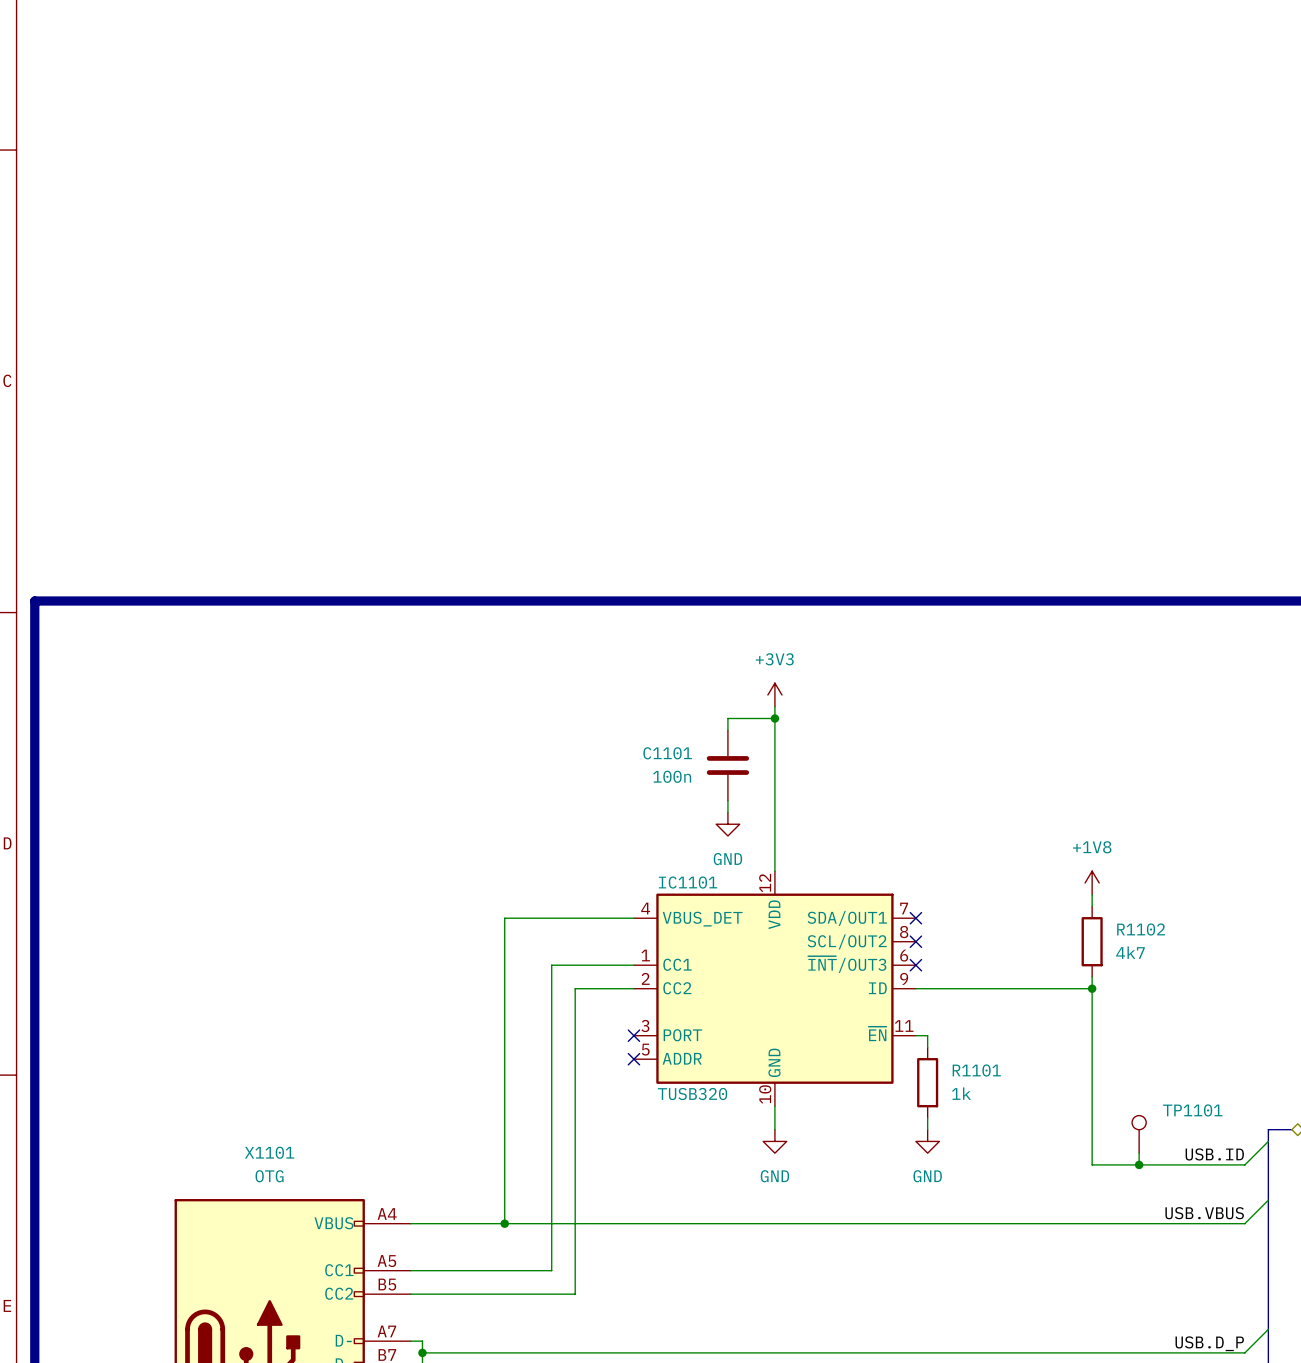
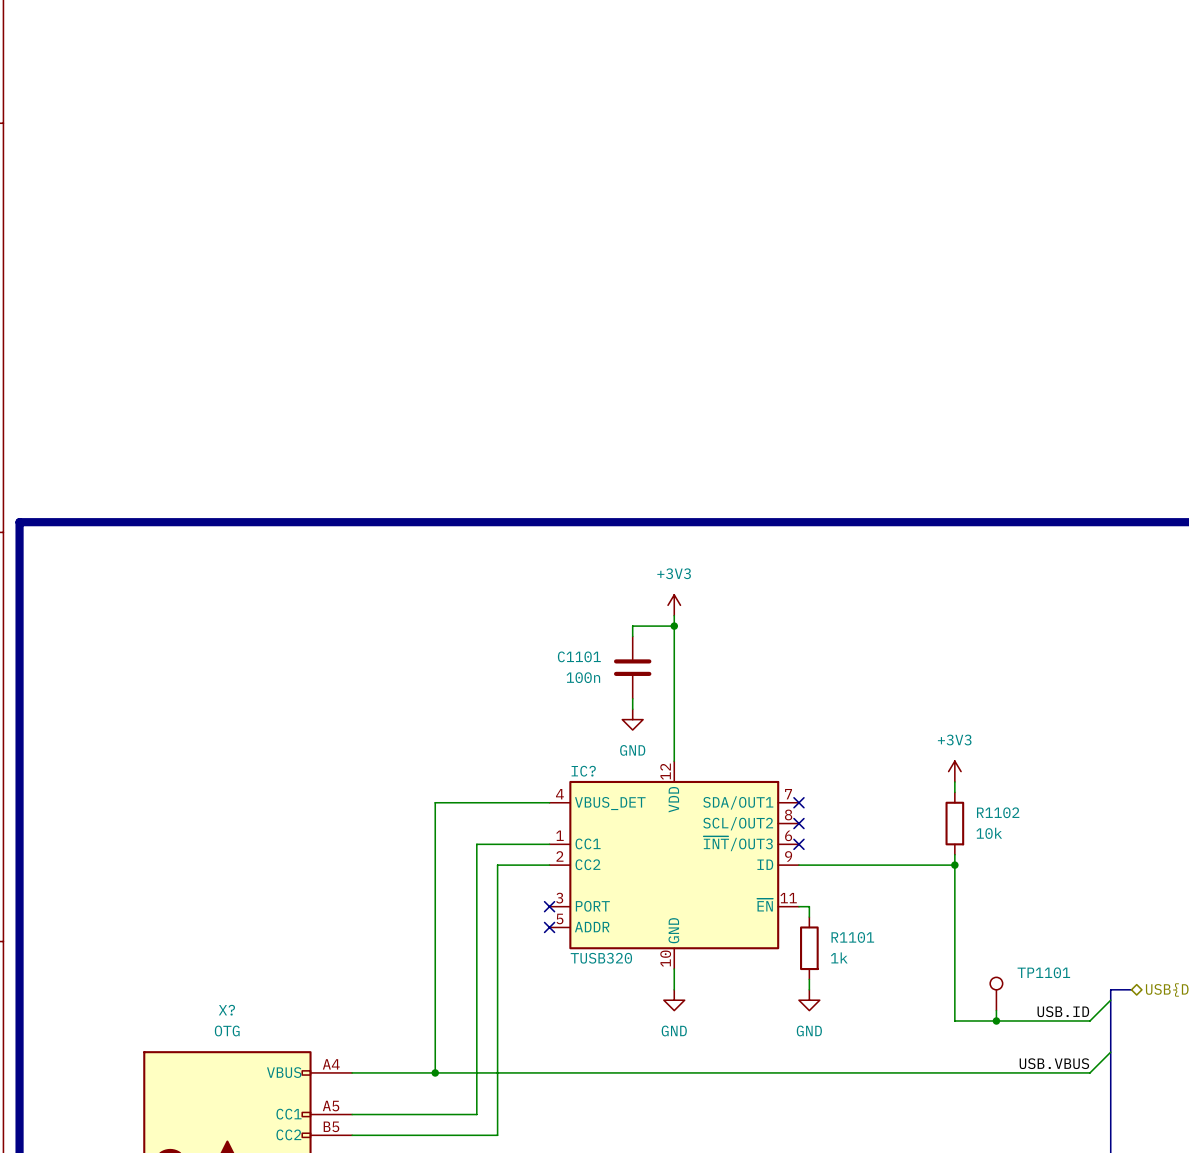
IC1101 name: IC1101 (688, 882) -> IC? (583, 771)
power symbol: +1V8 (1092, 882) -> +3V3 (954, 771)
R1102 value: 4k7 (1130, 952) -> 10k (989, 833)
X1101 name: X1101 (269, 1152) -> X? (226, 1010)

